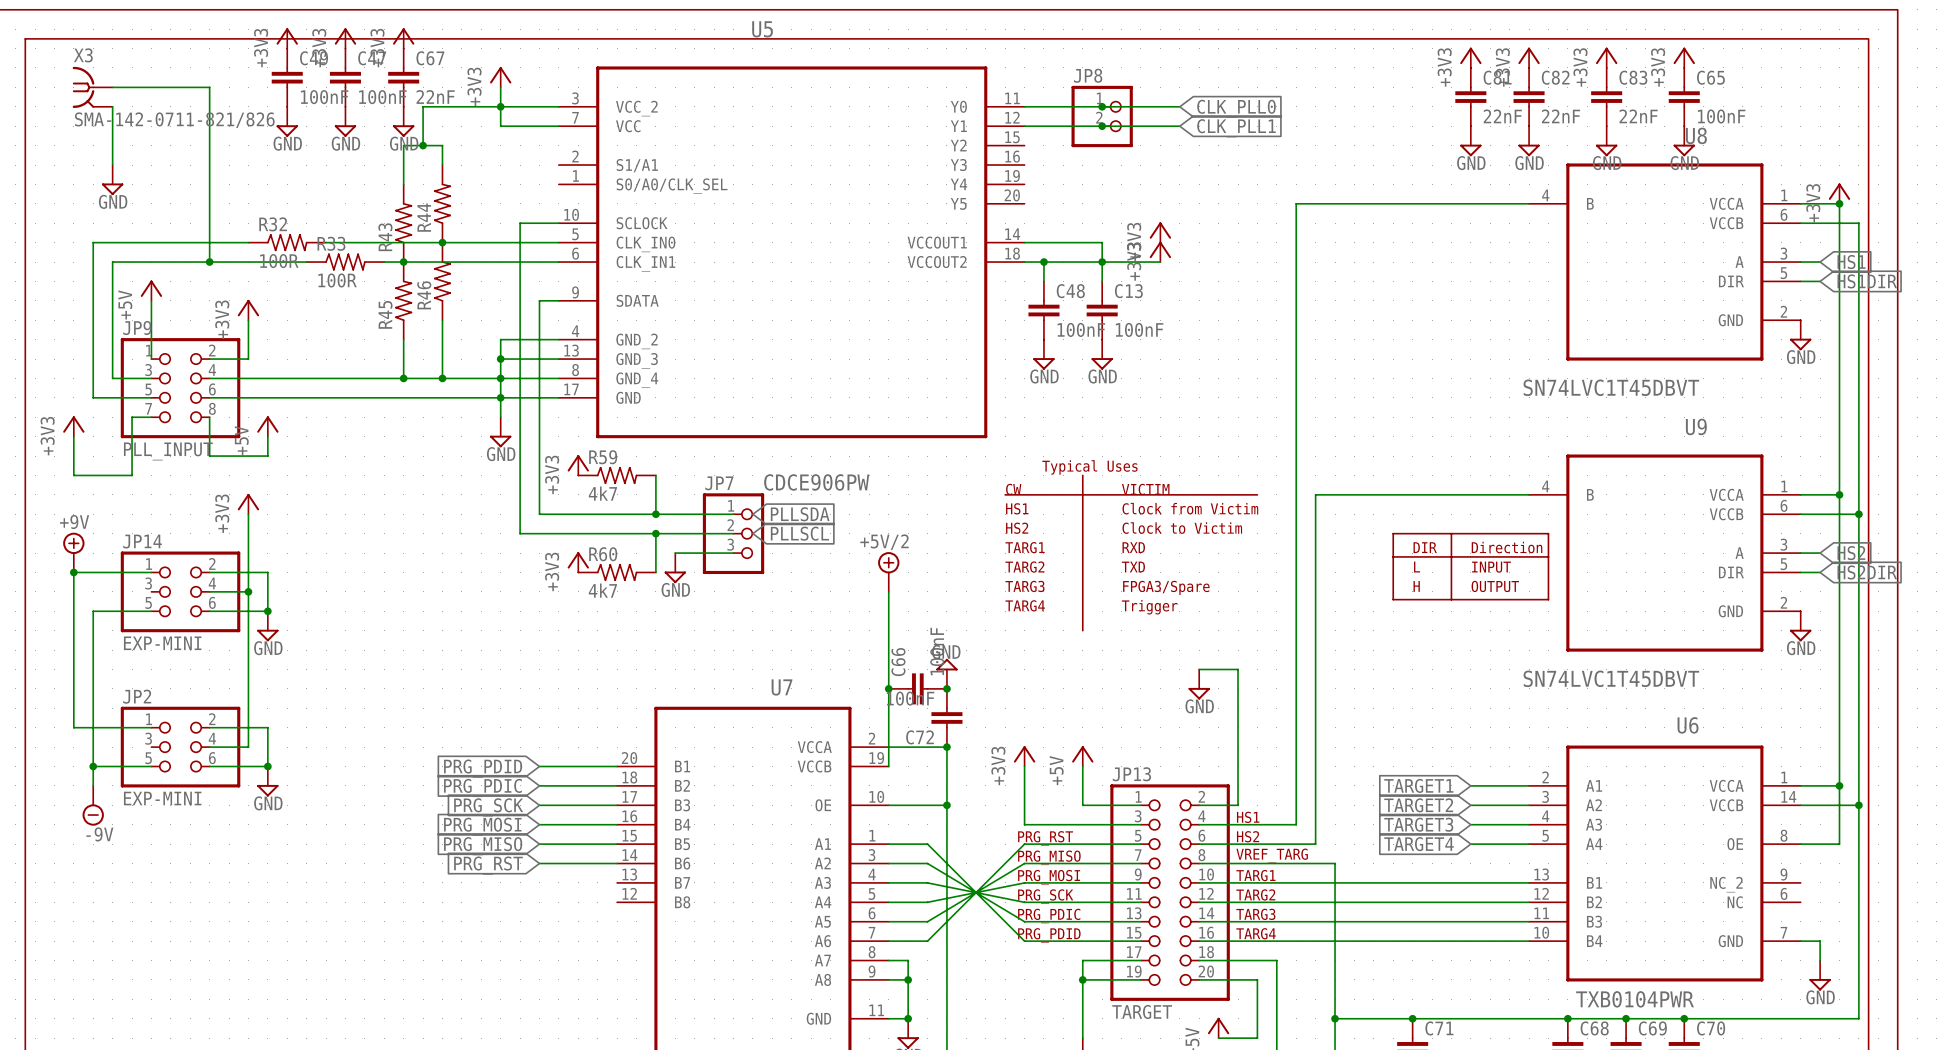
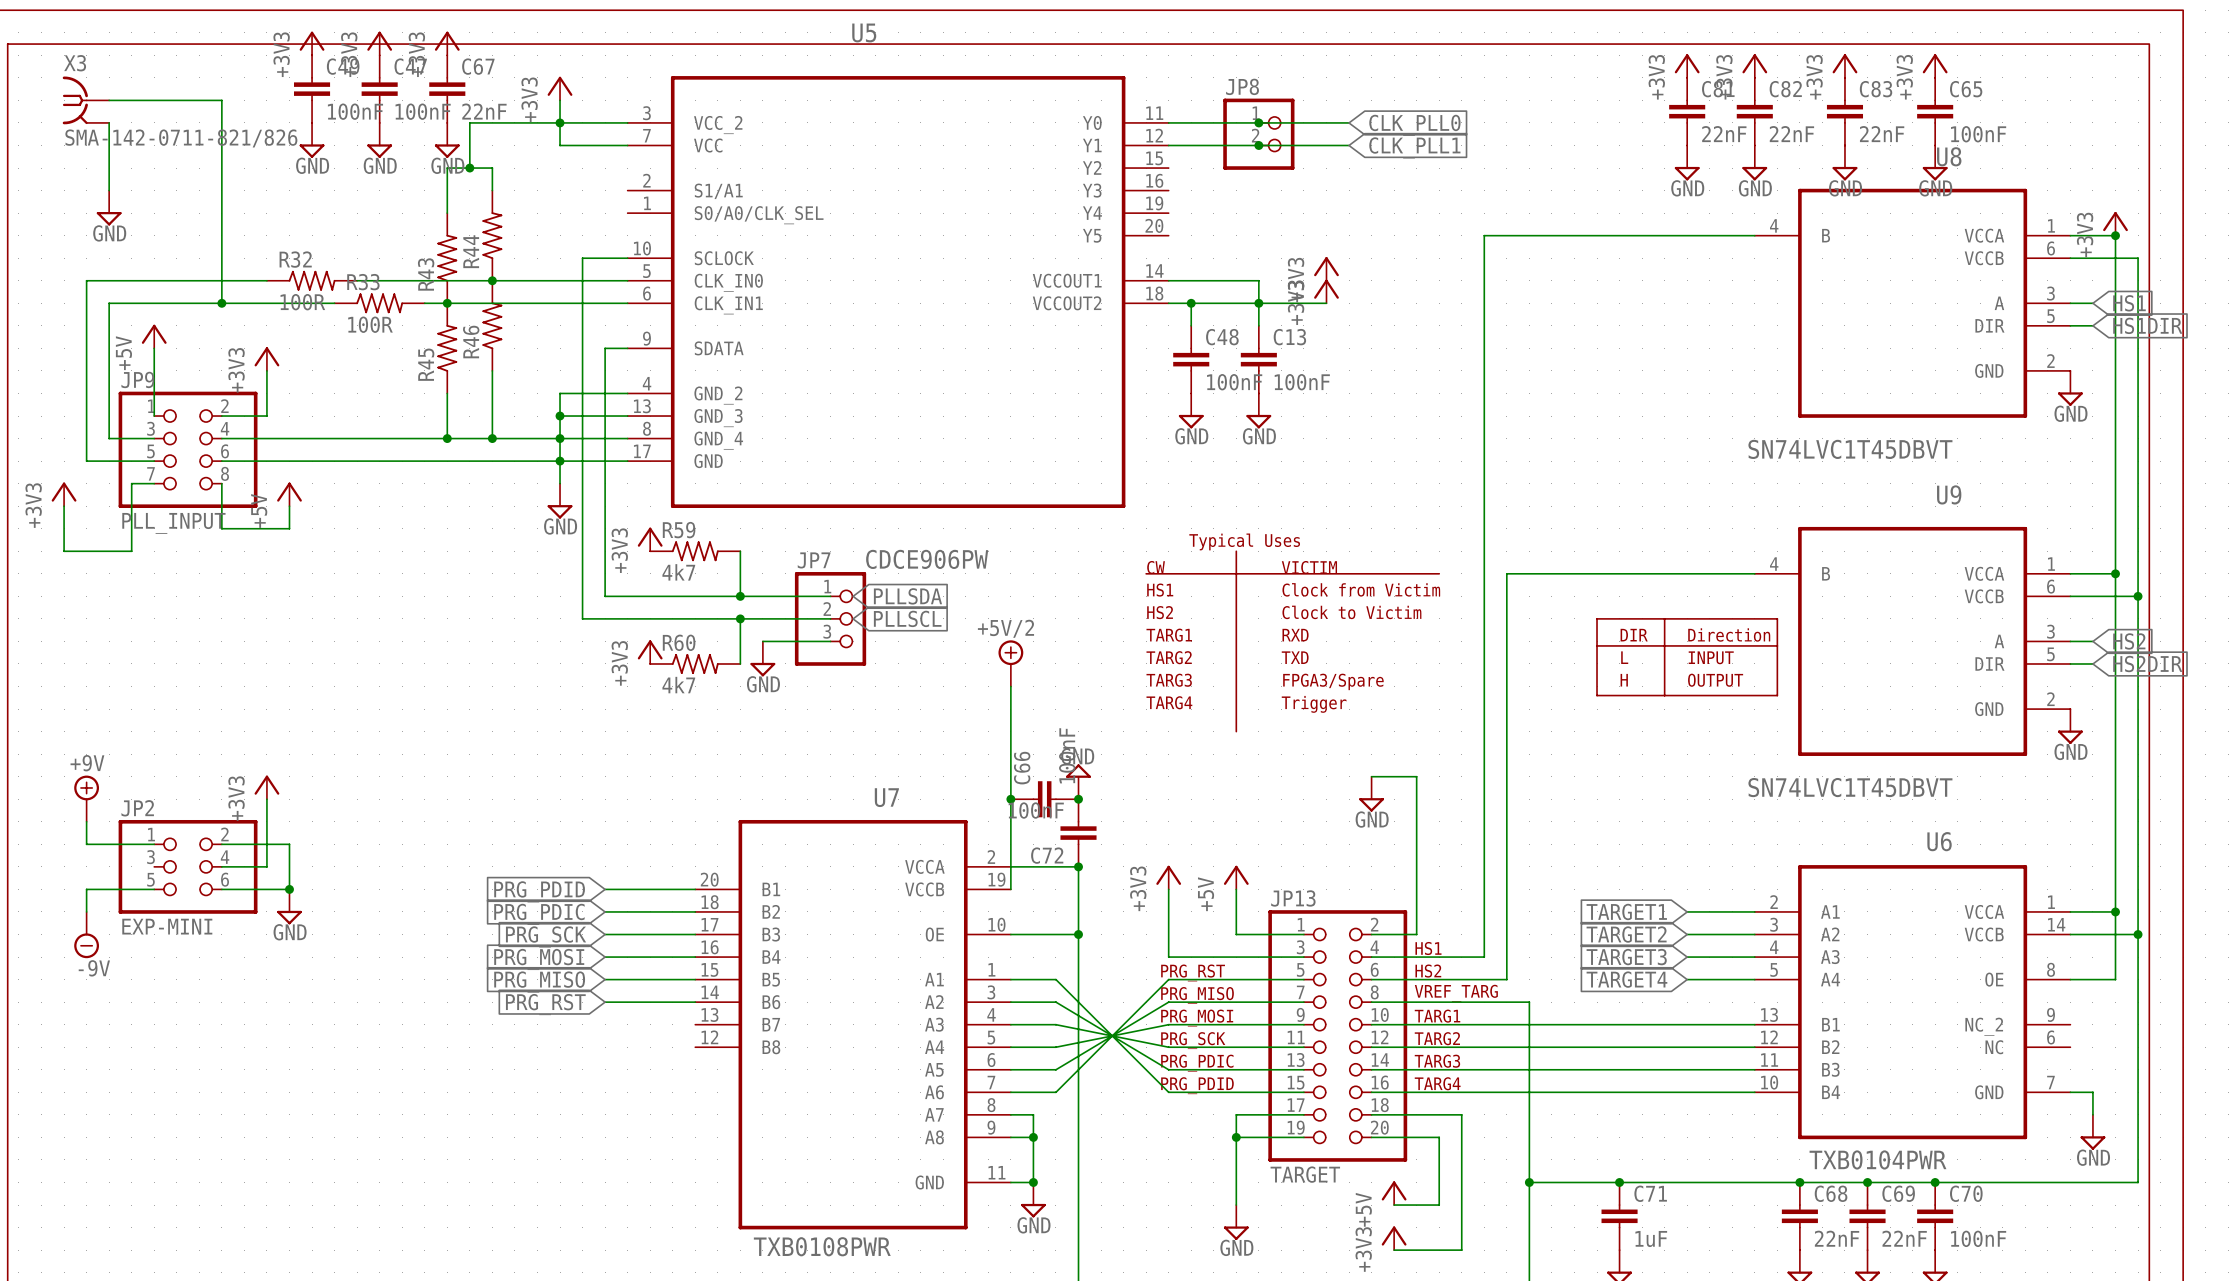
power symbol position: +3V3 (248, 504) -> +3V3 (266, 787)
wire: (248, 514) (248, 688) -> none
power symbol position: +9V (73, 552) -> +9V (86, 798)
junction: (73, 572) -> none
wire: (151, 572) (73, 572) (73, 727) (93, 727) (93, 766) -> none
wire: (209, 572) (267, 572) (267, 611) (209, 611) -> none
JP14: EXP-MINI (180, 591) -> none
wire: (209, 591) (248, 591) -> none
junction: (248, 591) -> none
wire: (151, 611) (93, 611) (93, 708) -> none
junction: (267, 611) -> none
power symbol: GND (267, 626) -> none
junction: (93, 766) -> none

